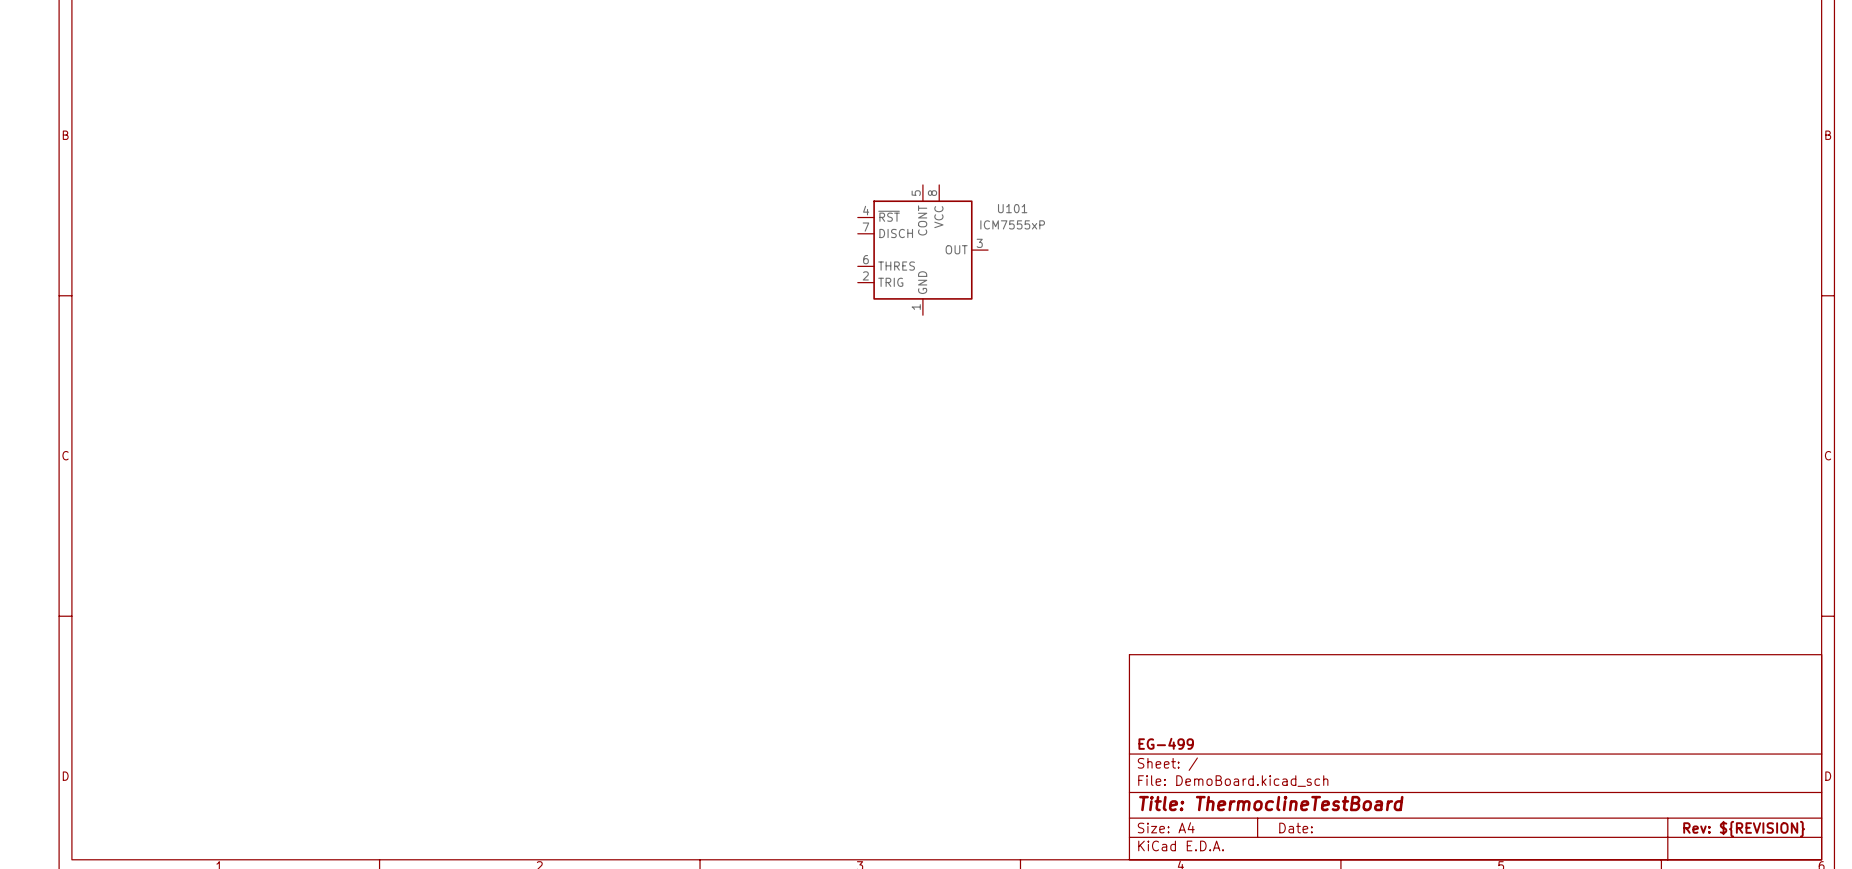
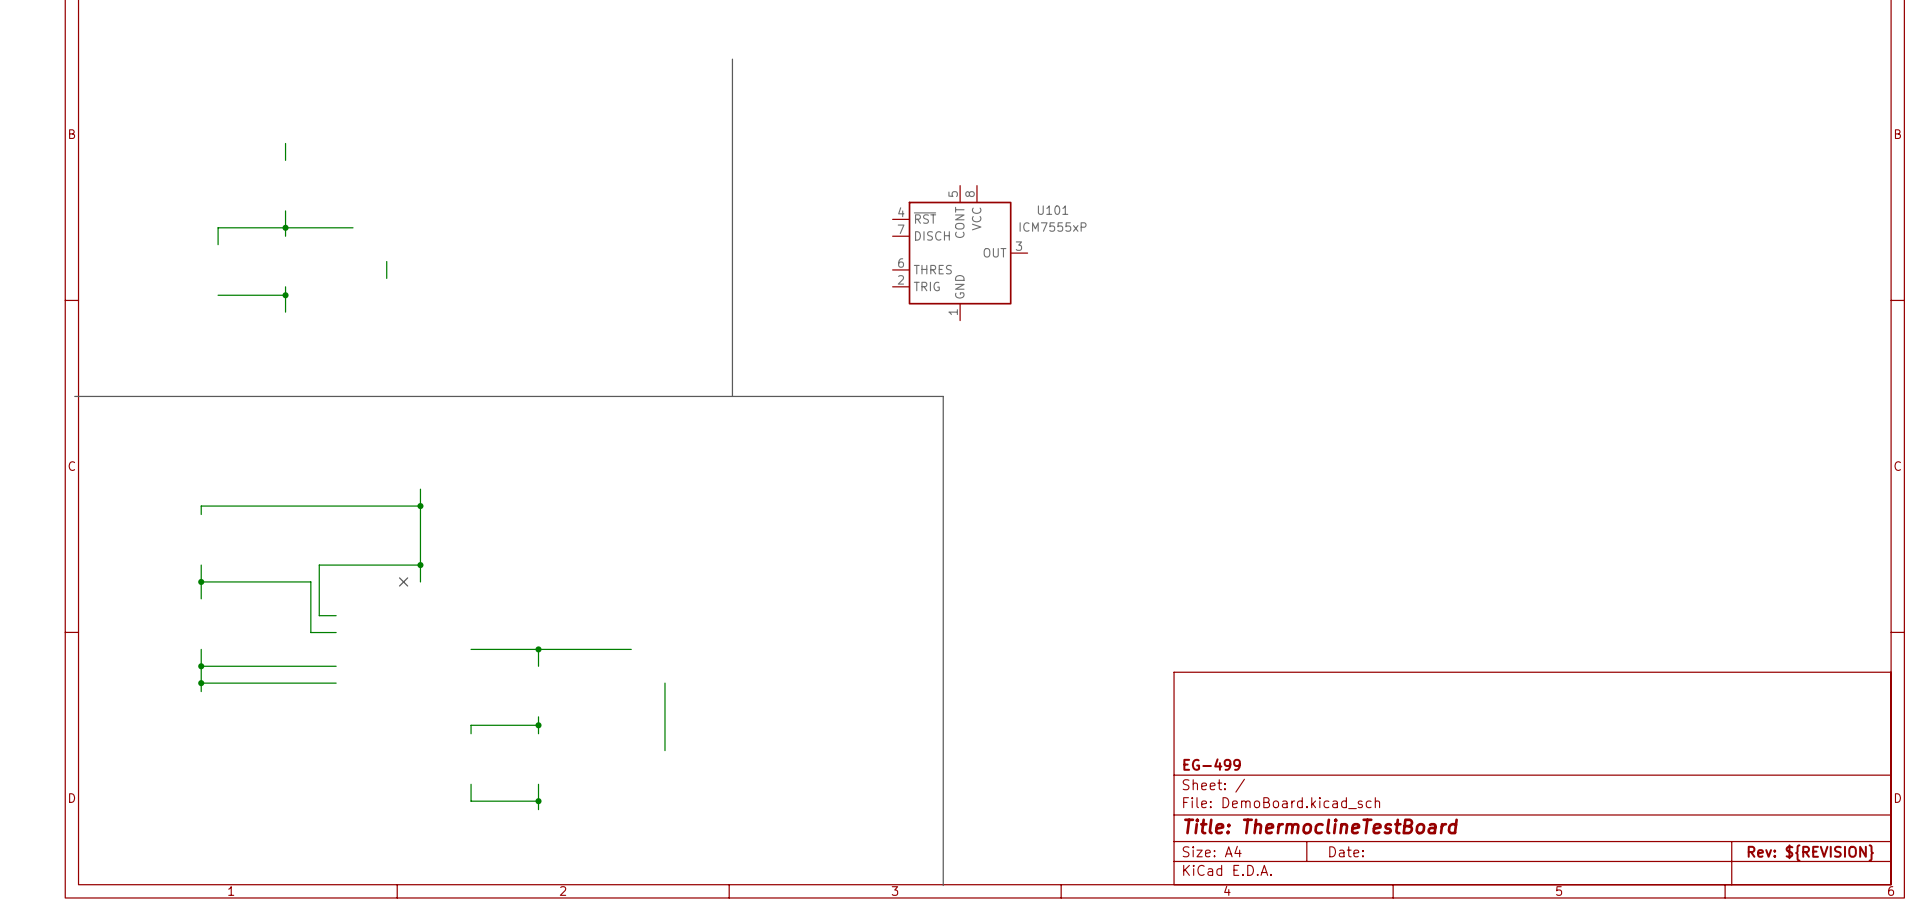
line: none -> (732, 59) (732, 396)
wire: none -> (285, 143) (285, 160)
wire: none -> (285, 210) (285, 236)
junction: none -> (285, 227)
wire: none -> (353, 227) (218, 227) (218, 244)
wire: none -> (386, 261) (386, 278)
wire: none -> (285, 286) (285, 312)
wire: none -> (218, 295) (285, 295)
junction: none -> (285, 295)
line: none -> (74, 396) (943, 396) (943, 885)
wire: none -> (420, 489) (420, 581)
wire: none -> (420, 506) (201, 506) (201, 514)
junction: none -> (420, 506)
wire: none -> (201, 565) (201, 598)
wire: none -> (420, 565) (319, 565) (319, 615) (336, 615)
junction: none -> (420, 565)
wire: none -> (201, 581) (310, 581) (310, 632) (336, 632)
junction: none -> (201, 581)
no-connect mark: none -> (403, 581)
wire: none -> (201, 649) (201, 691)
wire: none -> (471, 649) (631, 649)
wire: none -> (538, 649) (538, 666)
junction: none -> (538, 649)
wire: none -> (201, 666) (336, 666)
junction: none -> (201, 666)
wire: none -> (201, 683) (336, 683)
junction: none -> (201, 683)
wire: none -> (664, 683) (664, 750)
wire: none -> (538, 716) (538, 733)
wire: none -> (538, 725) (471, 725) (471, 733)
junction: none -> (538, 725)
wire: none -> (471, 784) (471, 801) (538, 801)
wire: none -> (538, 784) (538, 809)
junction: none -> (538, 801)

